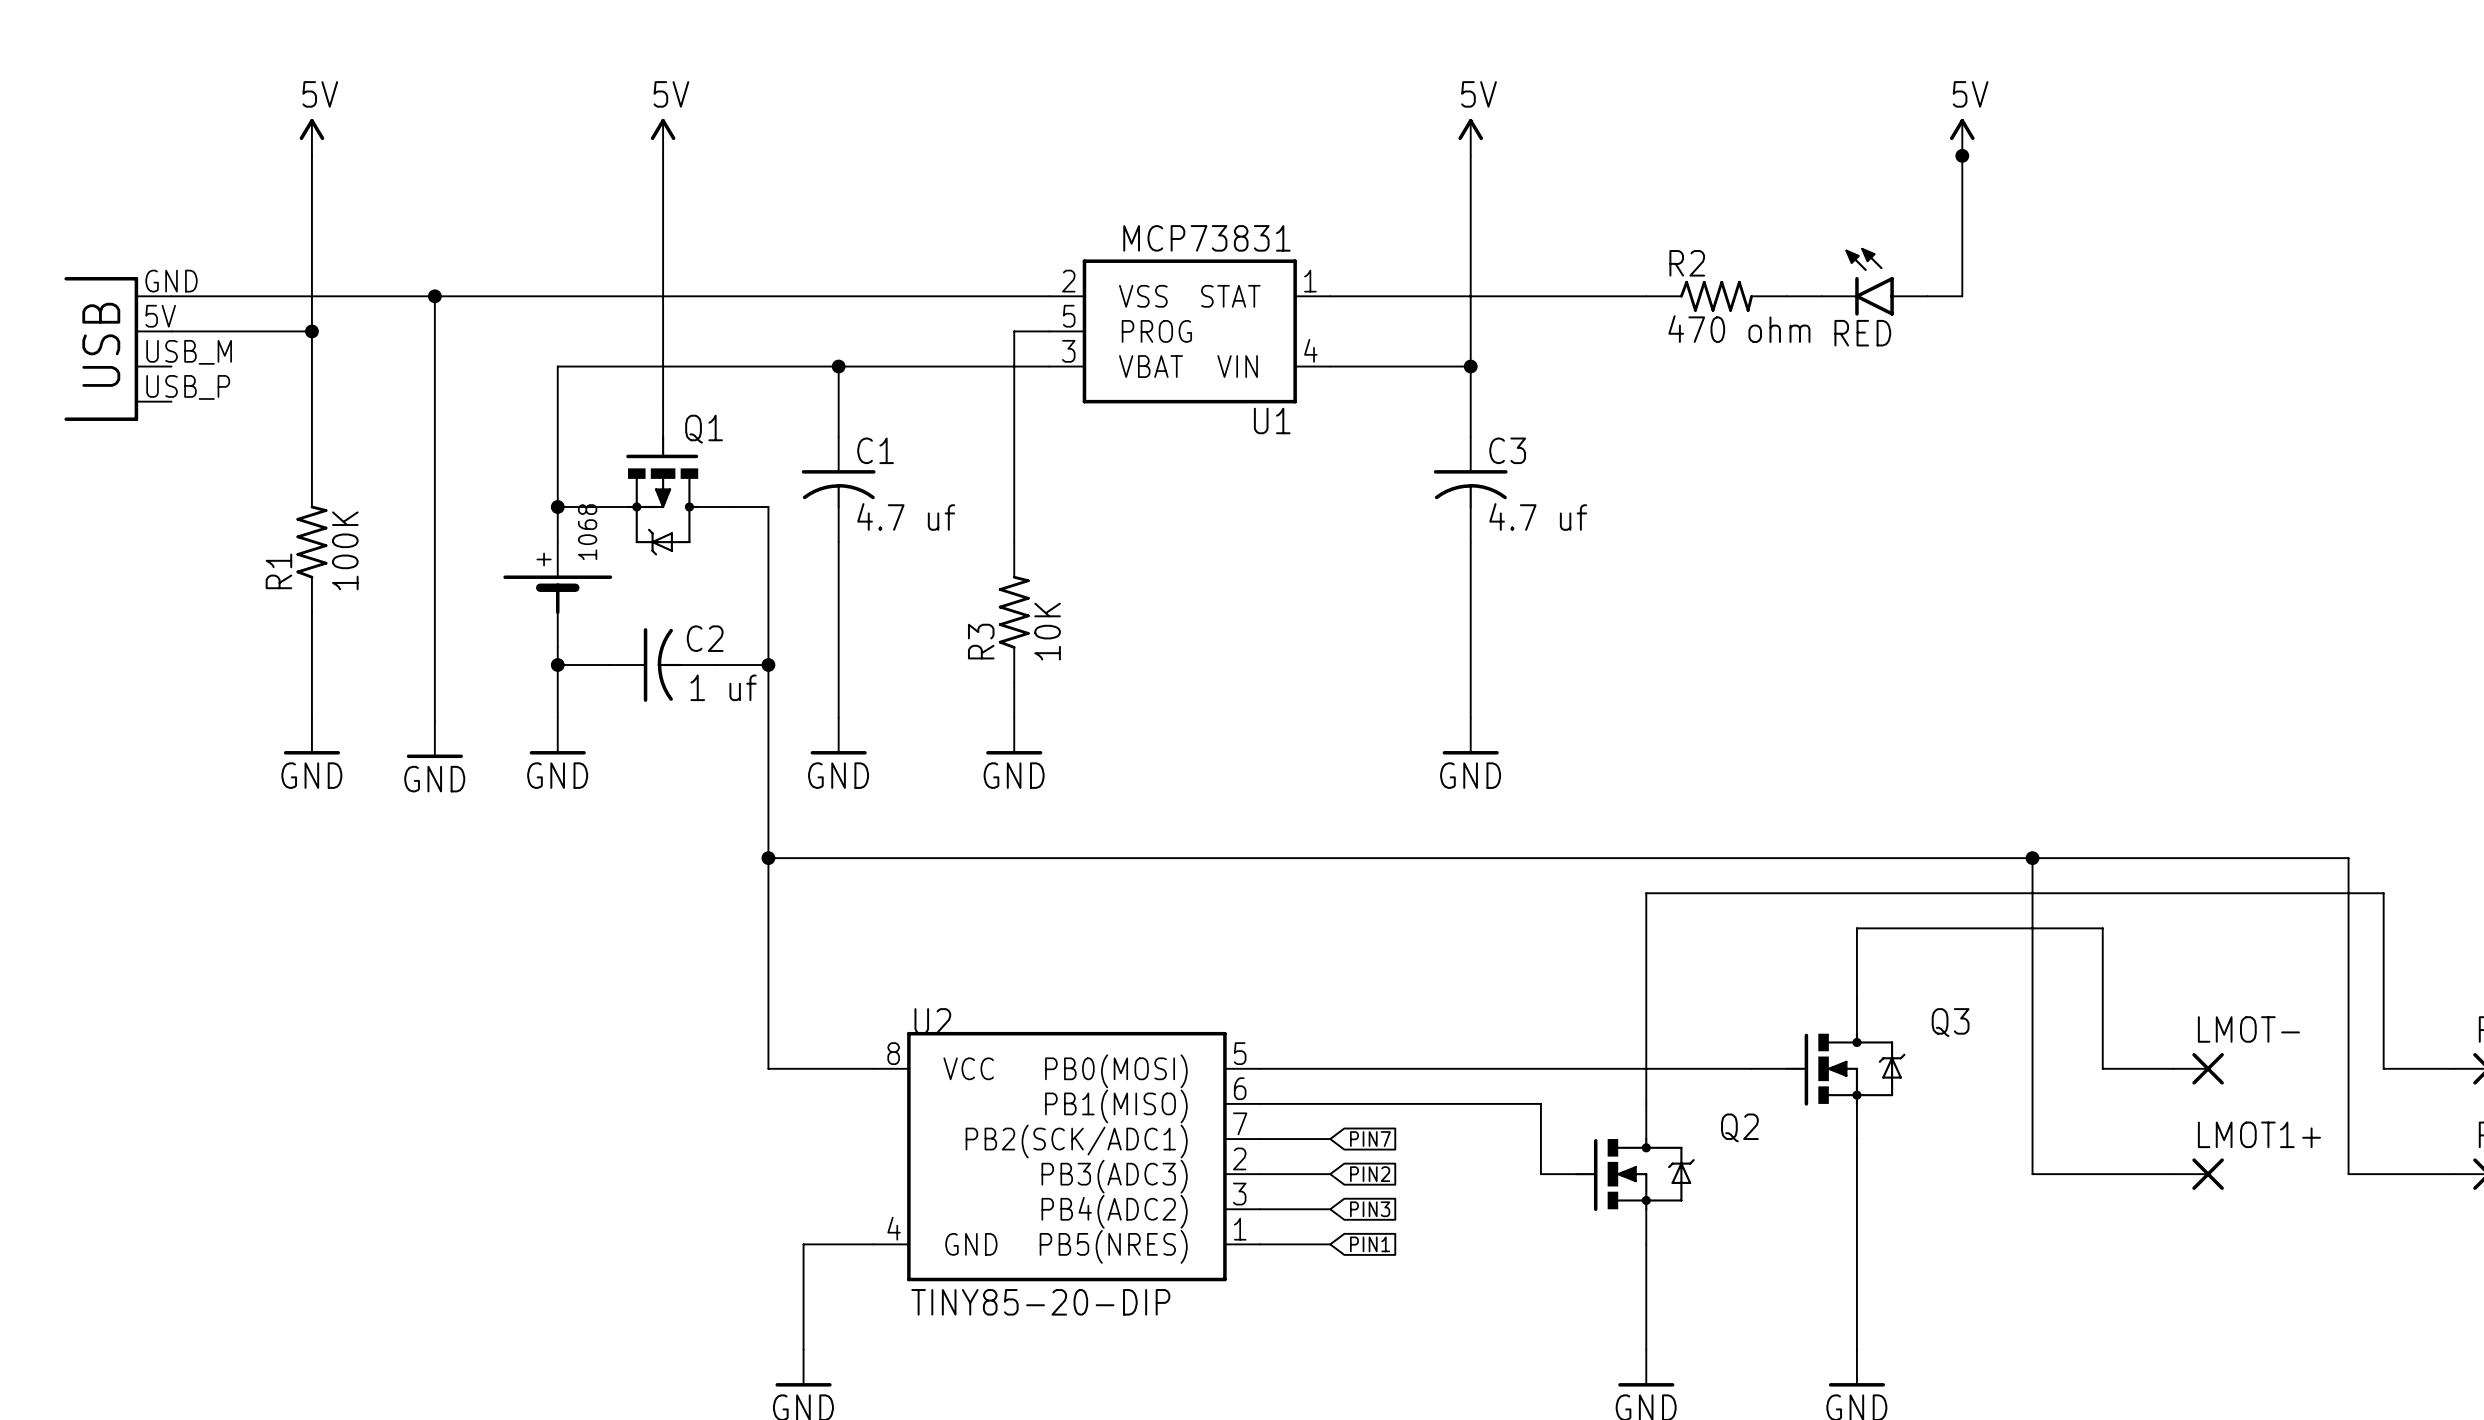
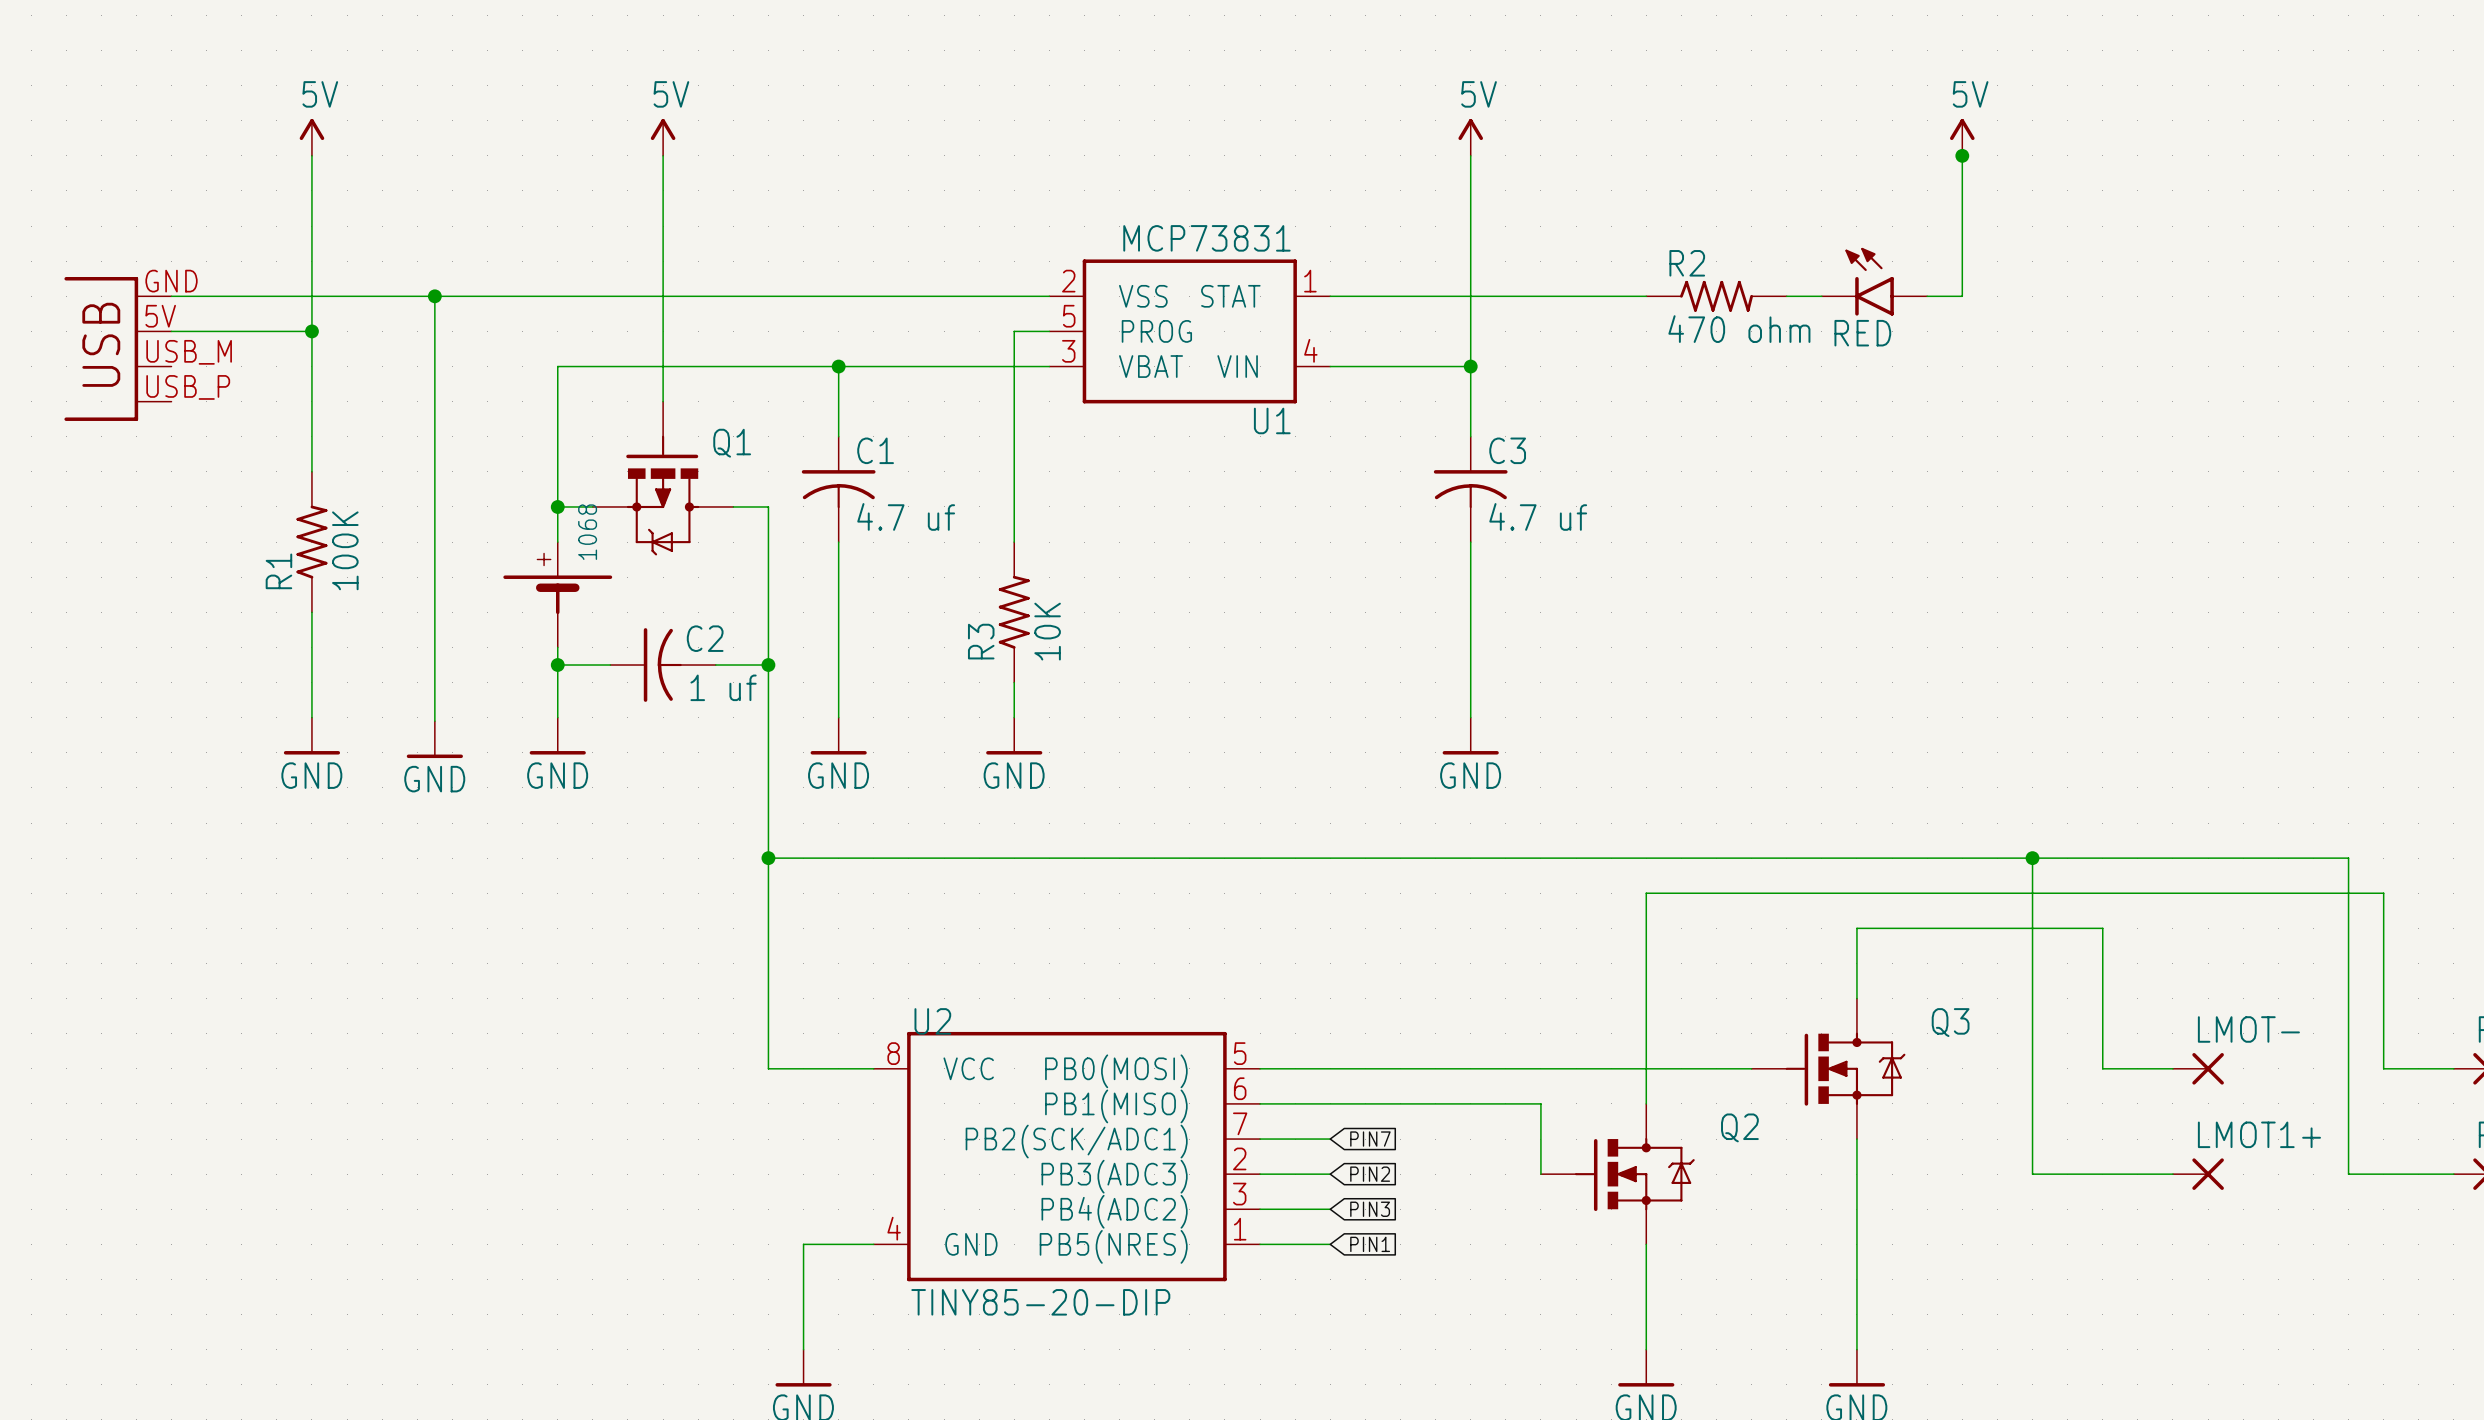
Q1 name position: Q1 (704, 429) -> Q1 (732, 443)

